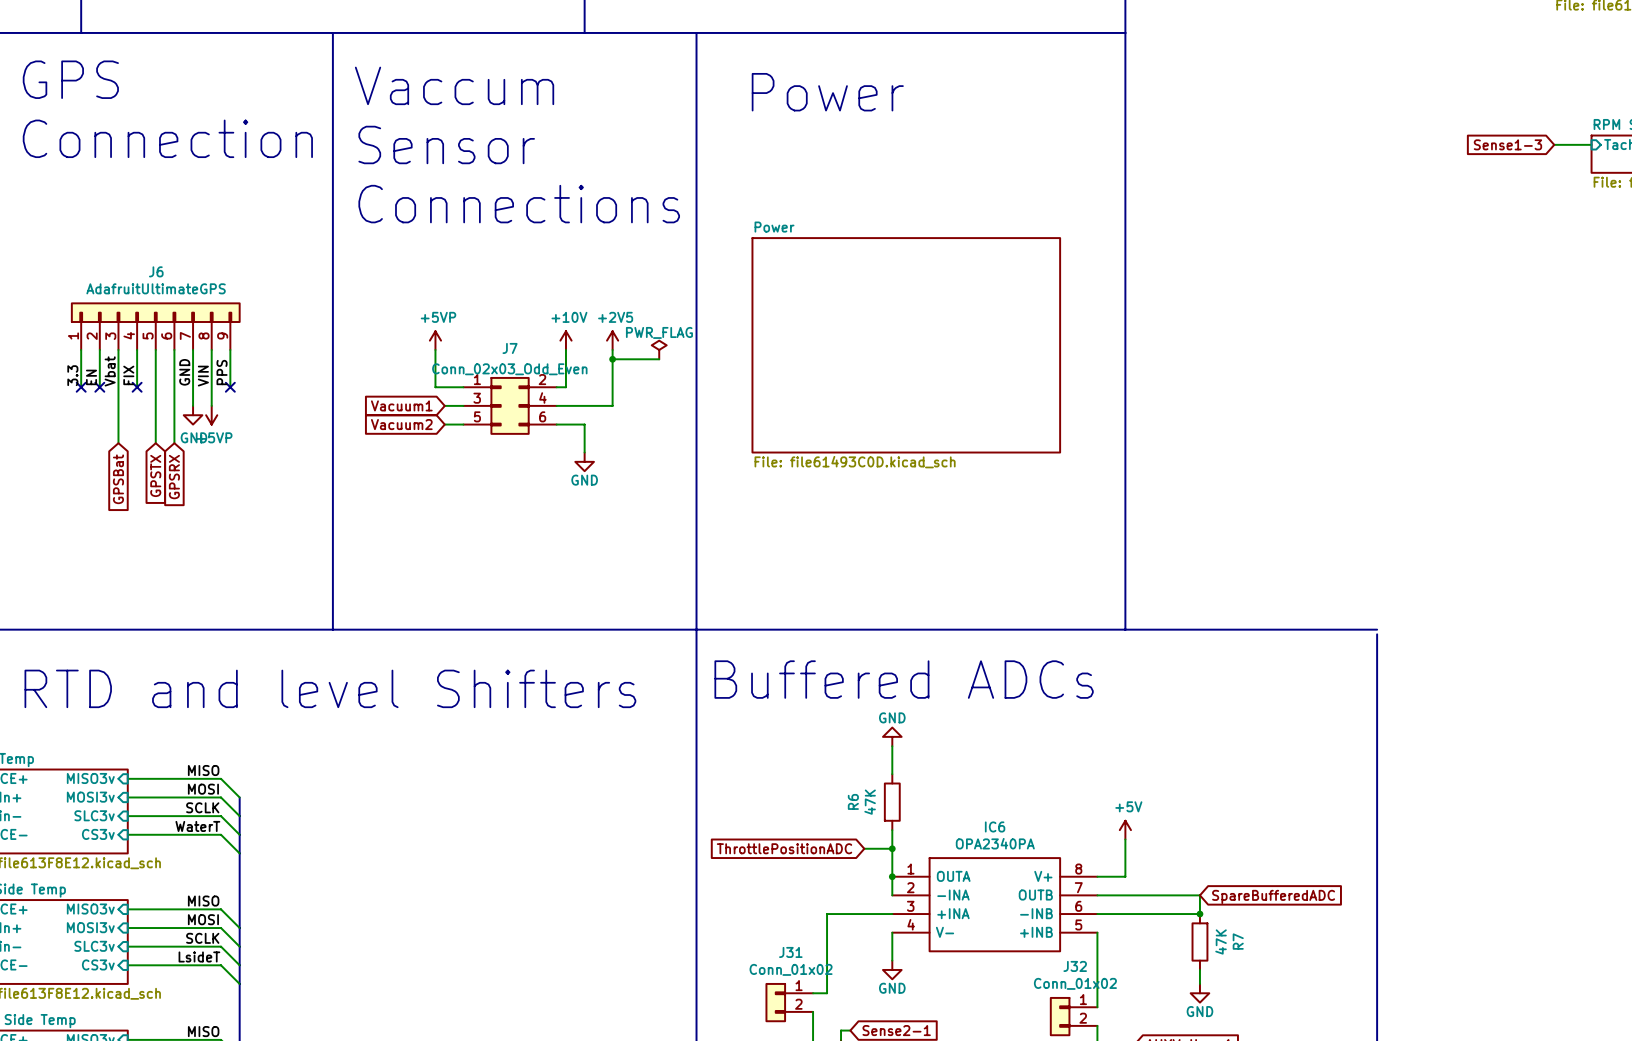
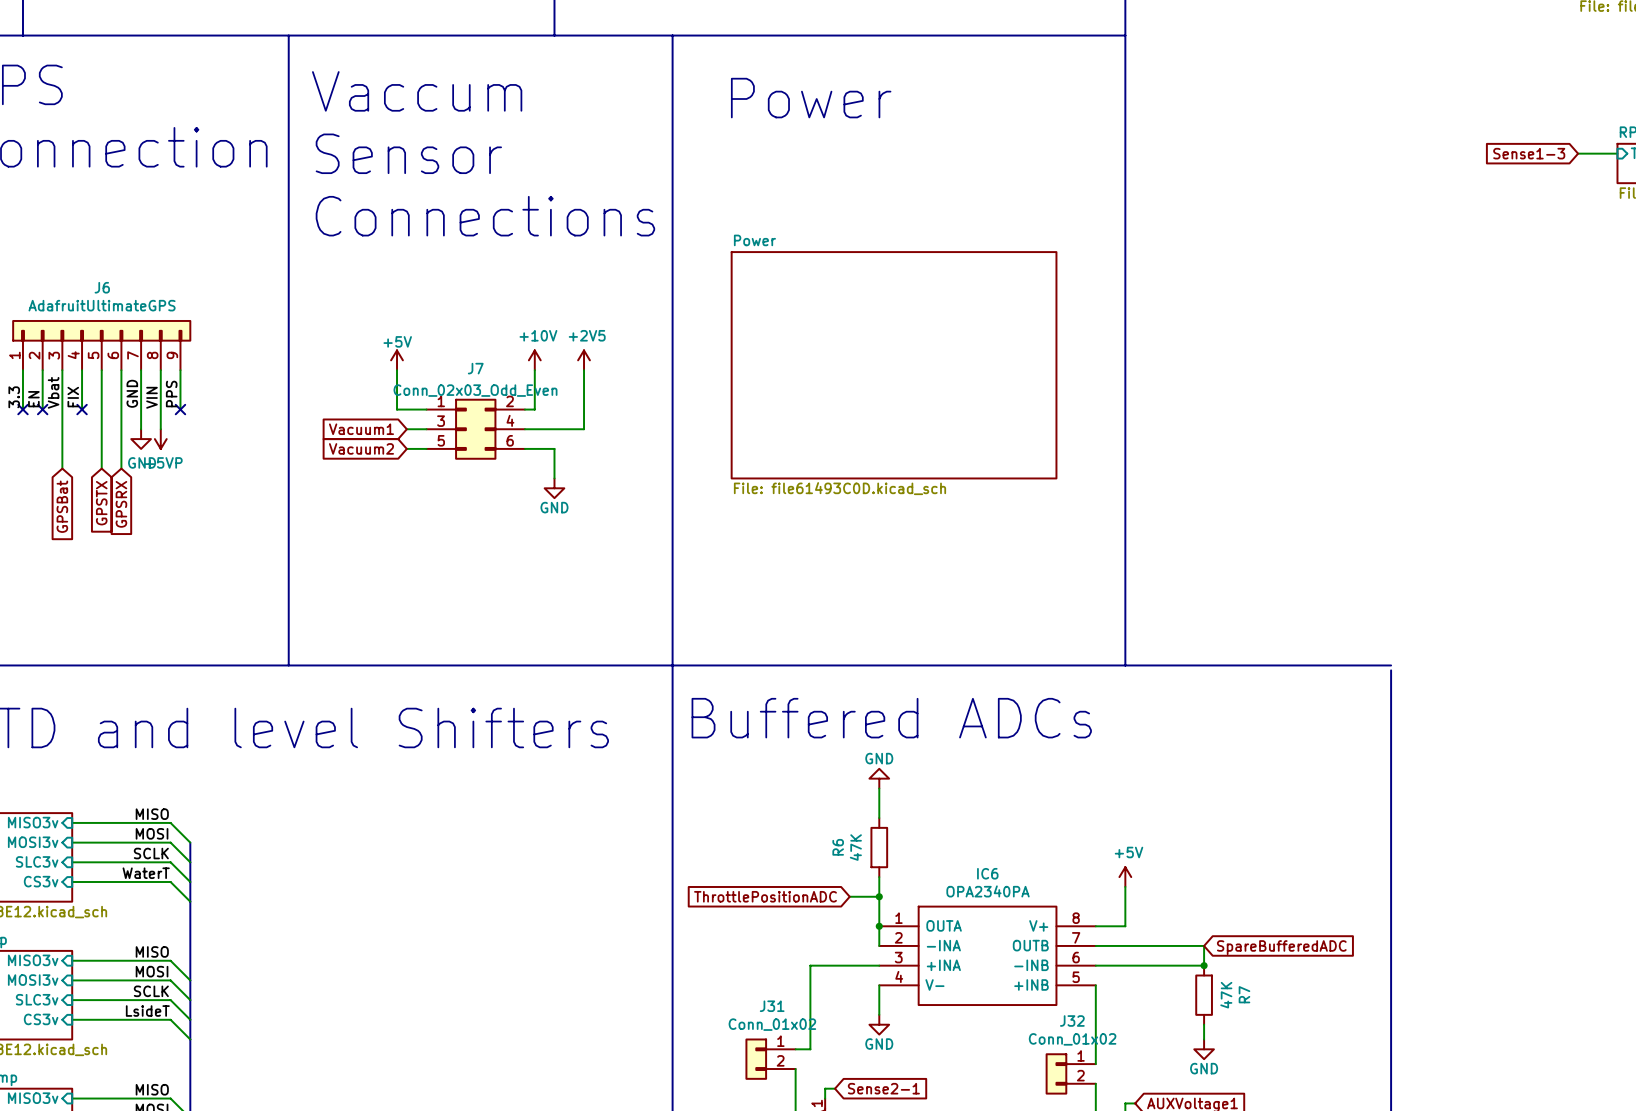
power symbol: +5VP (435, 340) -> +5V (397, 360)
power symbol: PWR_FLAG (659, 349) -> none
wire: (612, 359) (659, 359) -> none
junction: (612, 359) -> none

